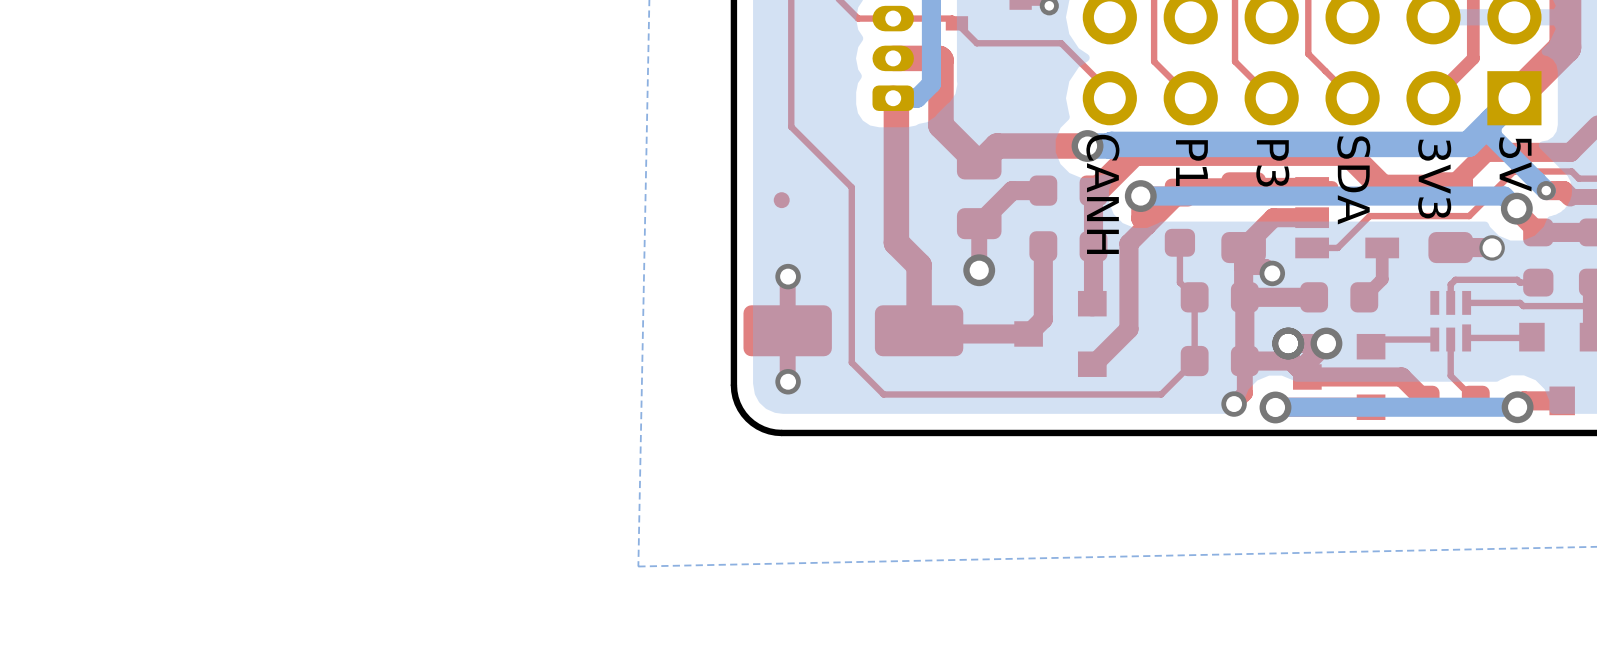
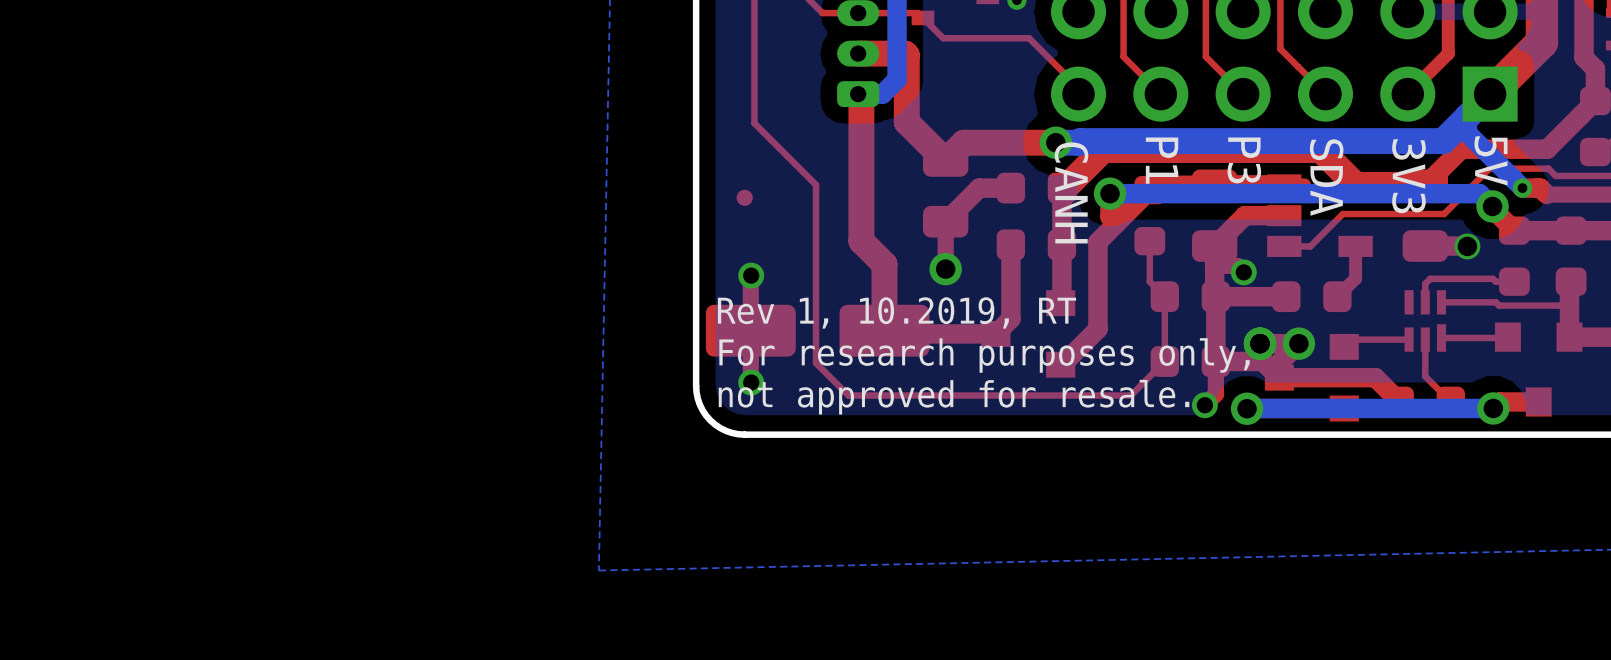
text: none -> Rev 1, 10.2019, RT (896, 312)
text: none -> For research purposes only, (984, 355)
text: none -> not approved for resale. (954, 397)

